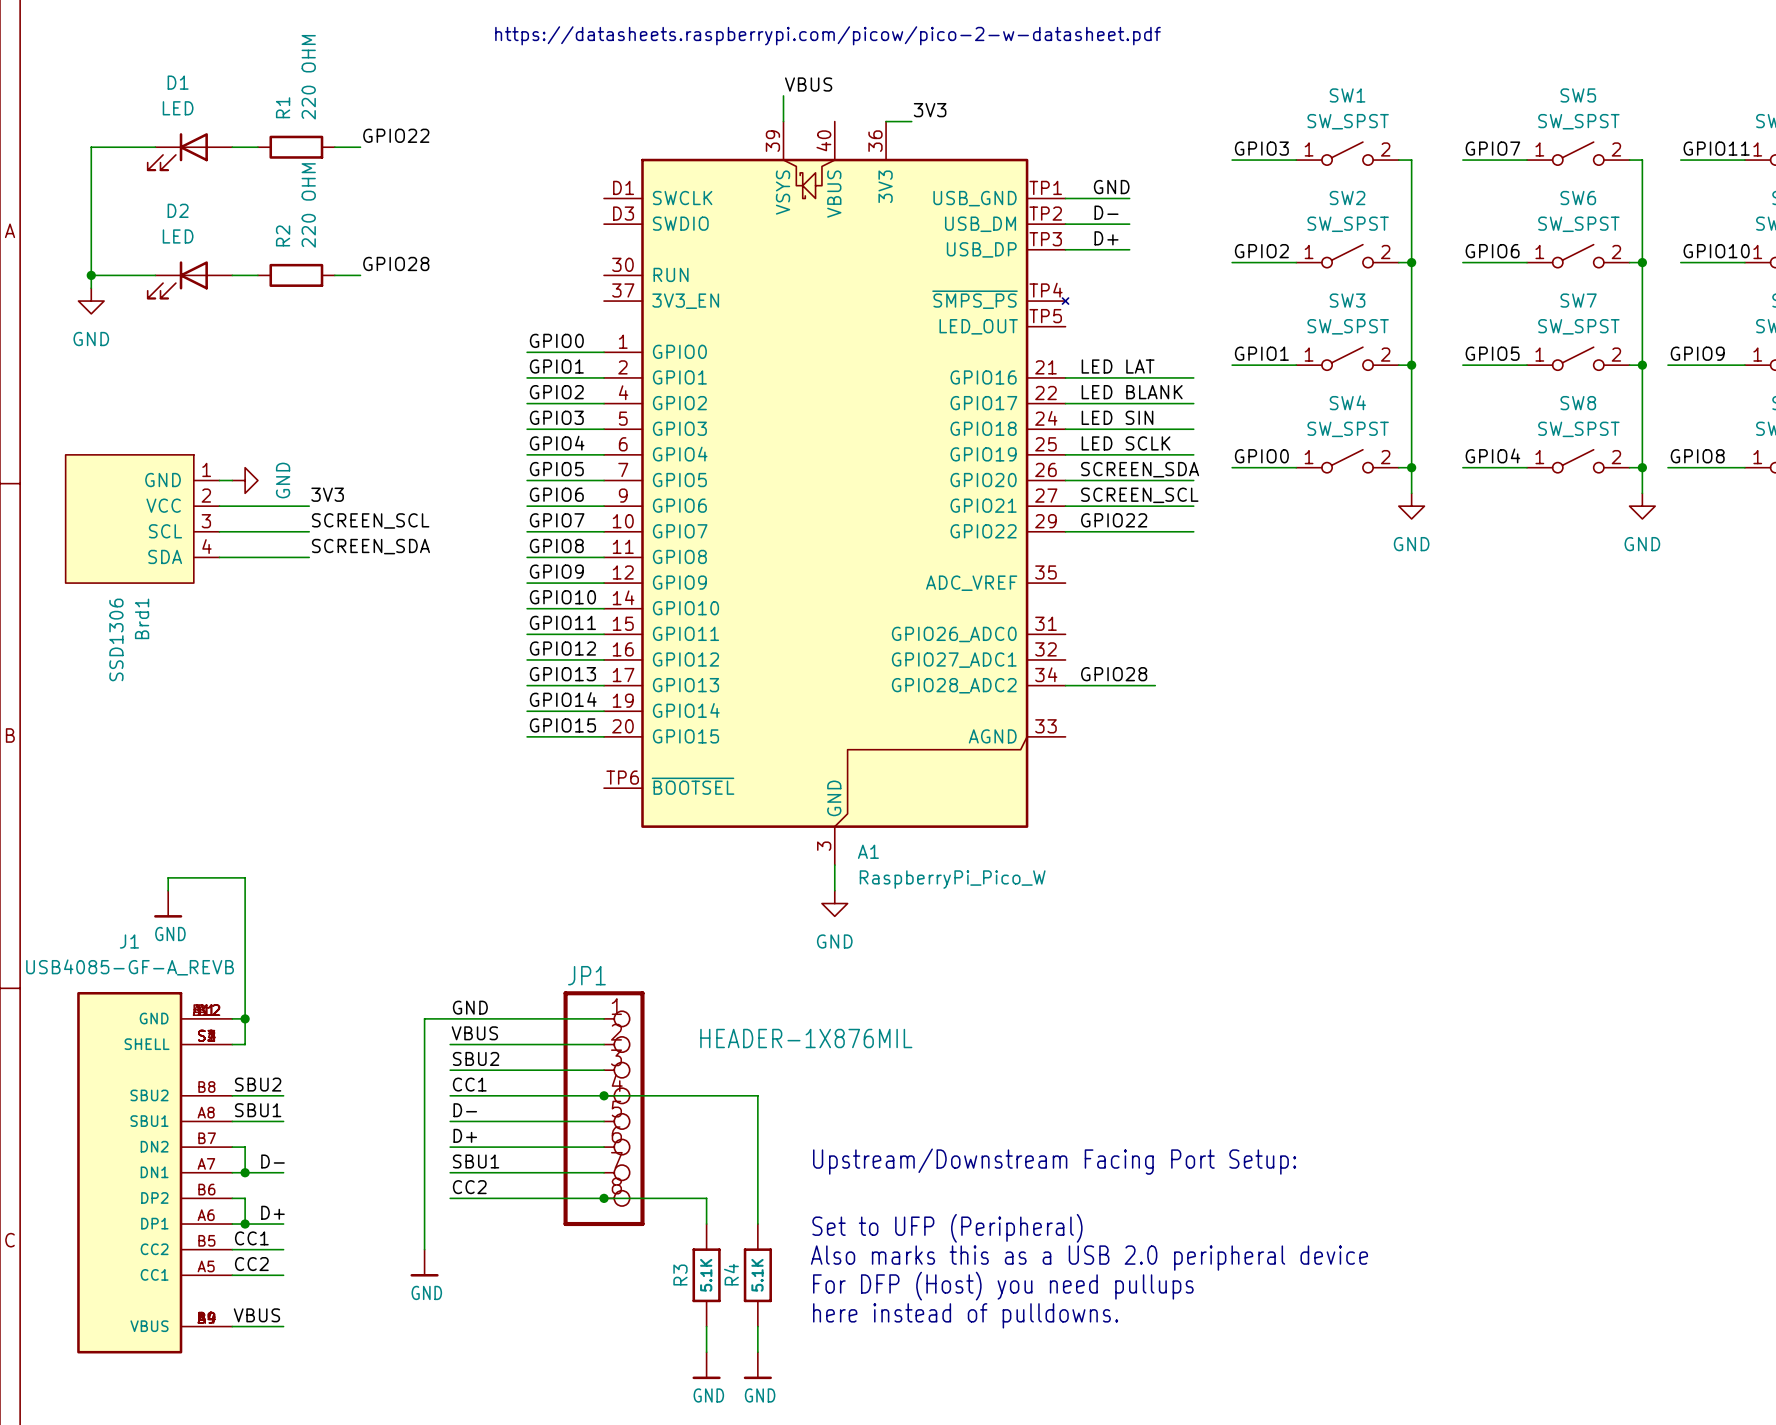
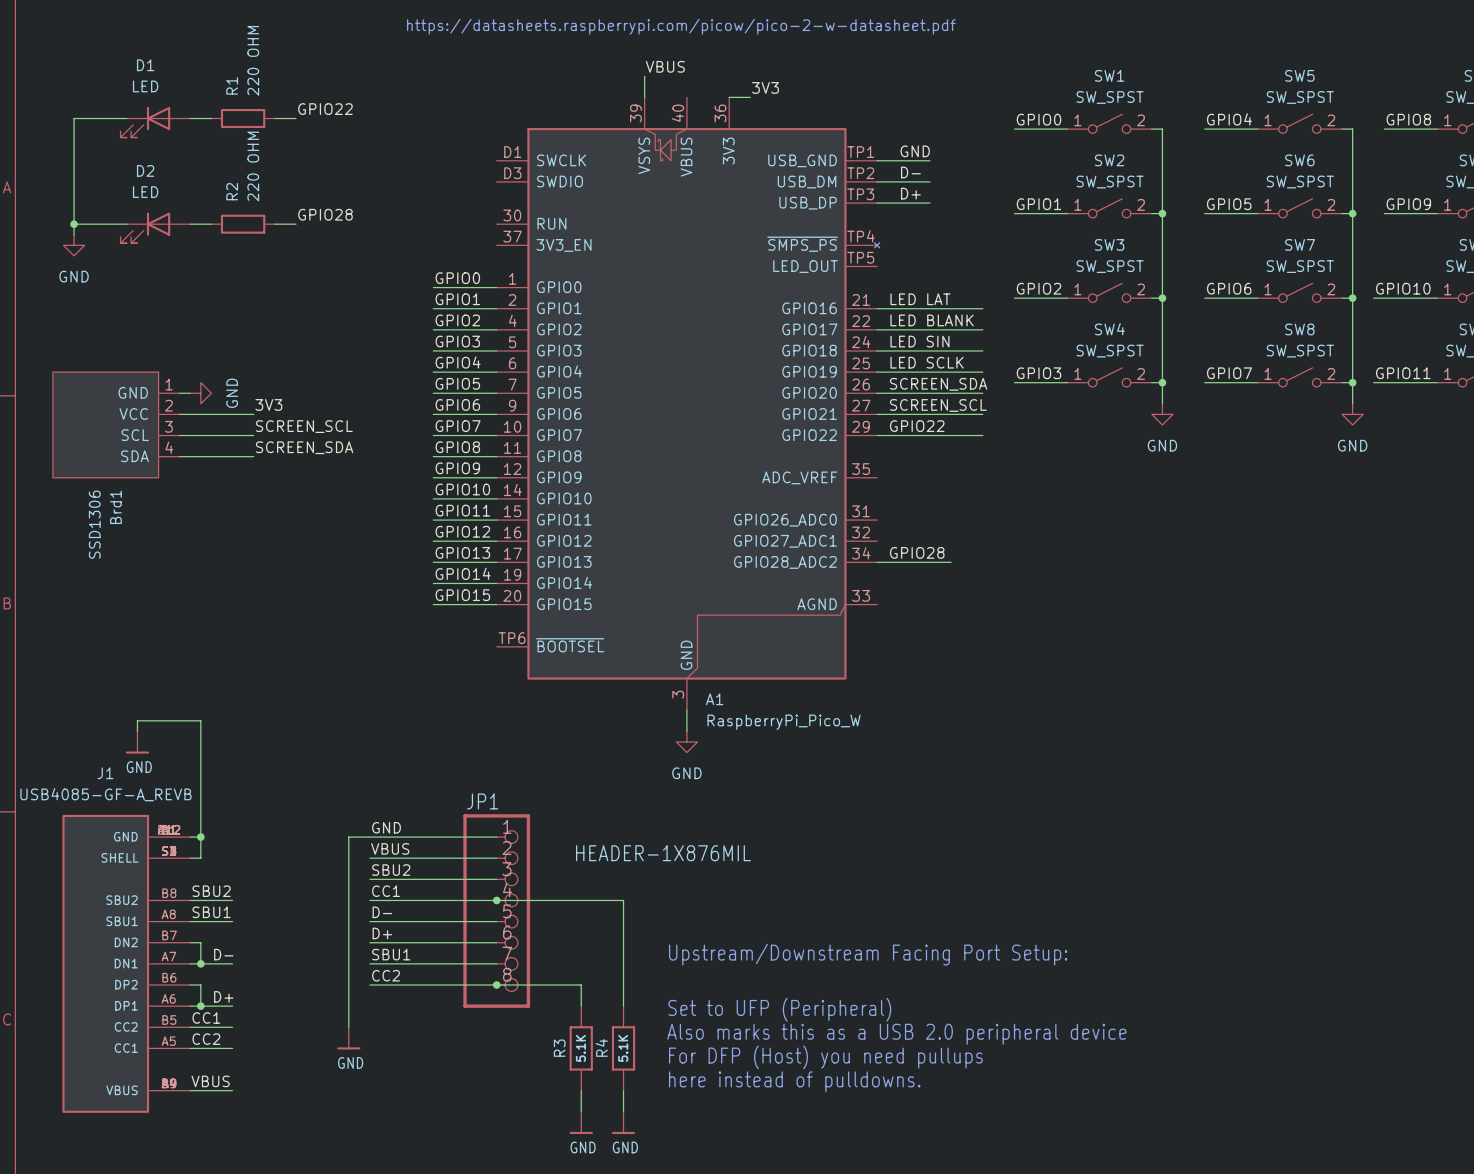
label: GPIO3 (1261, 148) -> GPIO0 (1038, 119)
label: GPIO7 (1492, 148) -> GPIO4 (1229, 119)
label: GPIO11 (1716, 148) -> GPIO8 (1408, 119)
label: GPIO2 (1261, 251) -> GPIO1 (1038, 204)
label: GPIO6 (1492, 251) -> GPIO5 (1229, 204)
label: GPIO10 (1716, 251) -> GPIO9 (1408, 204)
label: GPIO1 (1261, 353) -> GPIO2 (1038, 288)
label: GPIO5 (1492, 353) -> GPIO6 (1229, 288)
label: GPIO9 (1697, 353) -> GPIO10 (1403, 288)
label: GPIO4 (1492, 455) -> GPIO7 (1229, 373)
label: GPIO0 (1261, 456) -> GPIO3 (1038, 373)
label: GPIO8 (1697, 456) -> GPIO11 (1403, 373)

